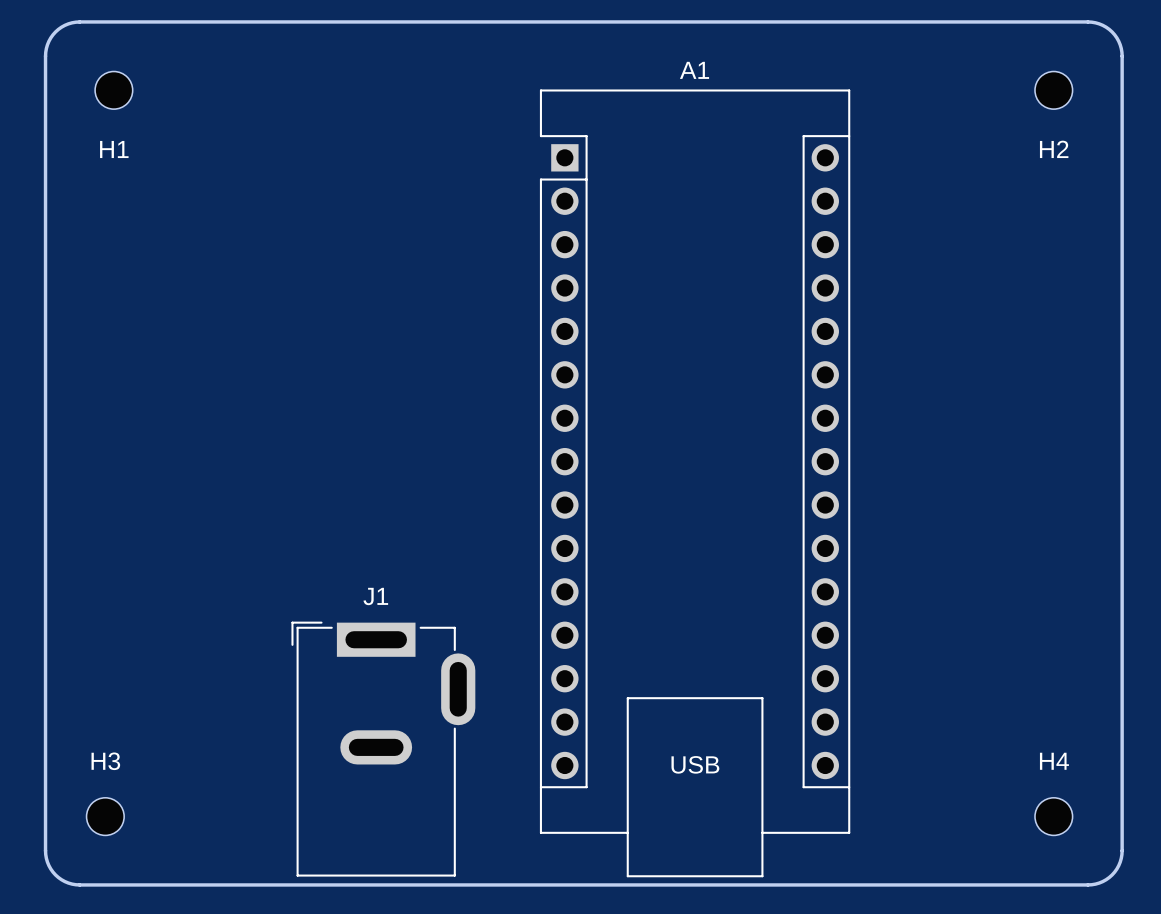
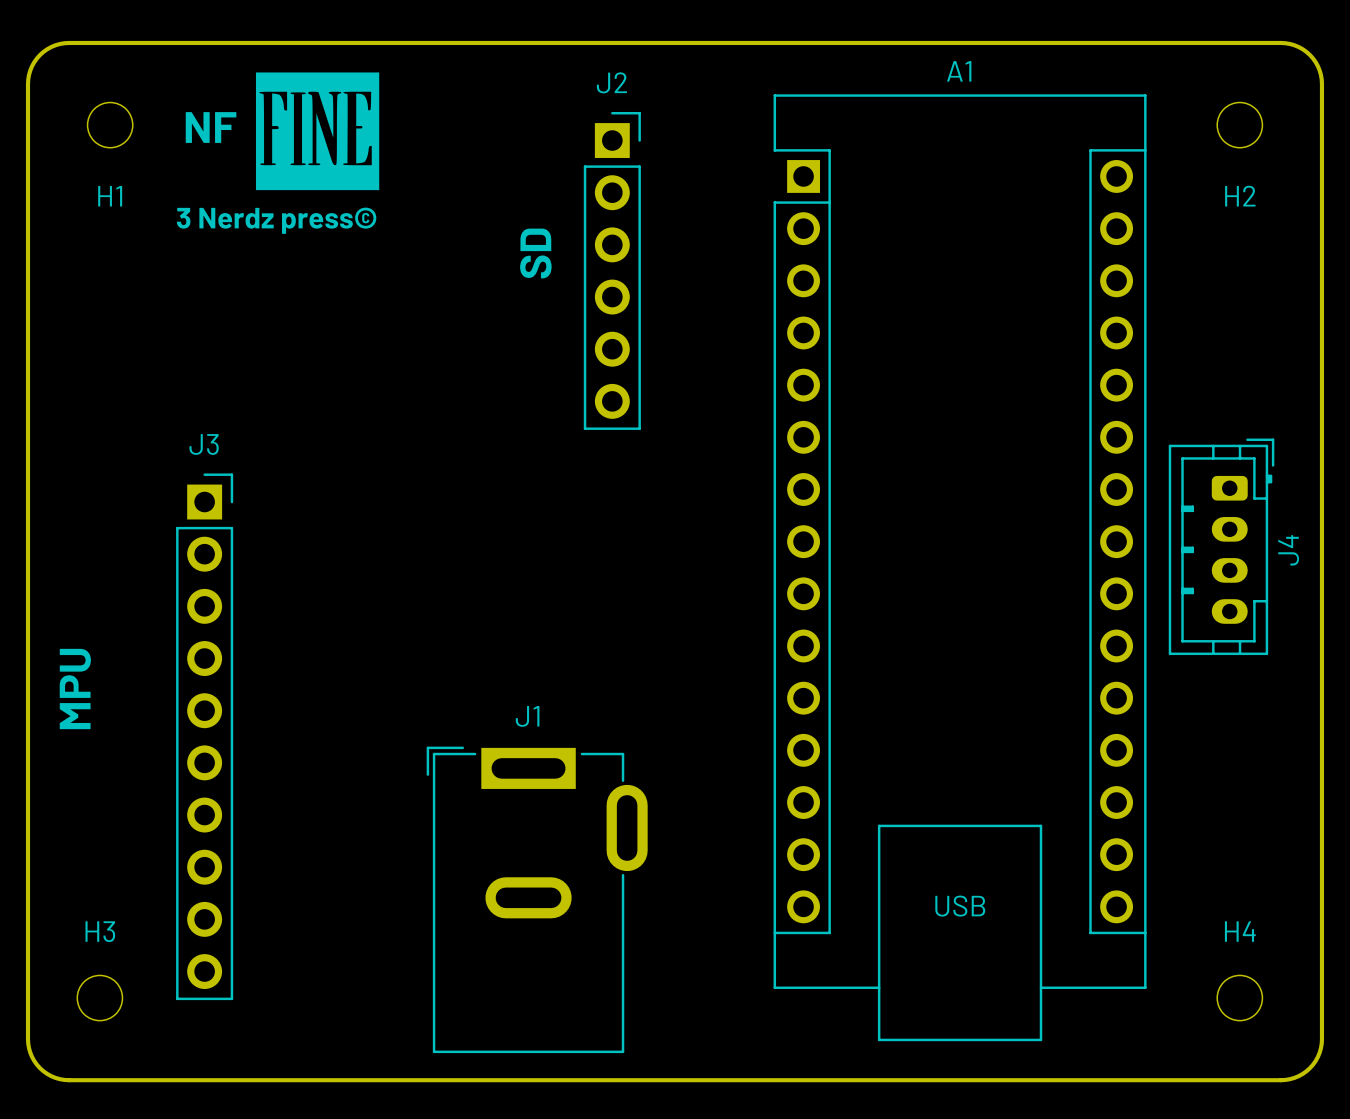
drawing: none -> [255, 72, 380, 191]
text: none -> NF (211, 127)
text: none -> 3 Nerdz press© (276, 220)
text: none -> SD (535, 253)
J2: none -> (612, 270)
J4: none -> (1221, 546)
A1 position: (695, 483) -> (960, 567)
text: none -> MPU (75, 689)
J3: none -> (204, 736)
J1 position: (383, 749) -> (537, 899)

